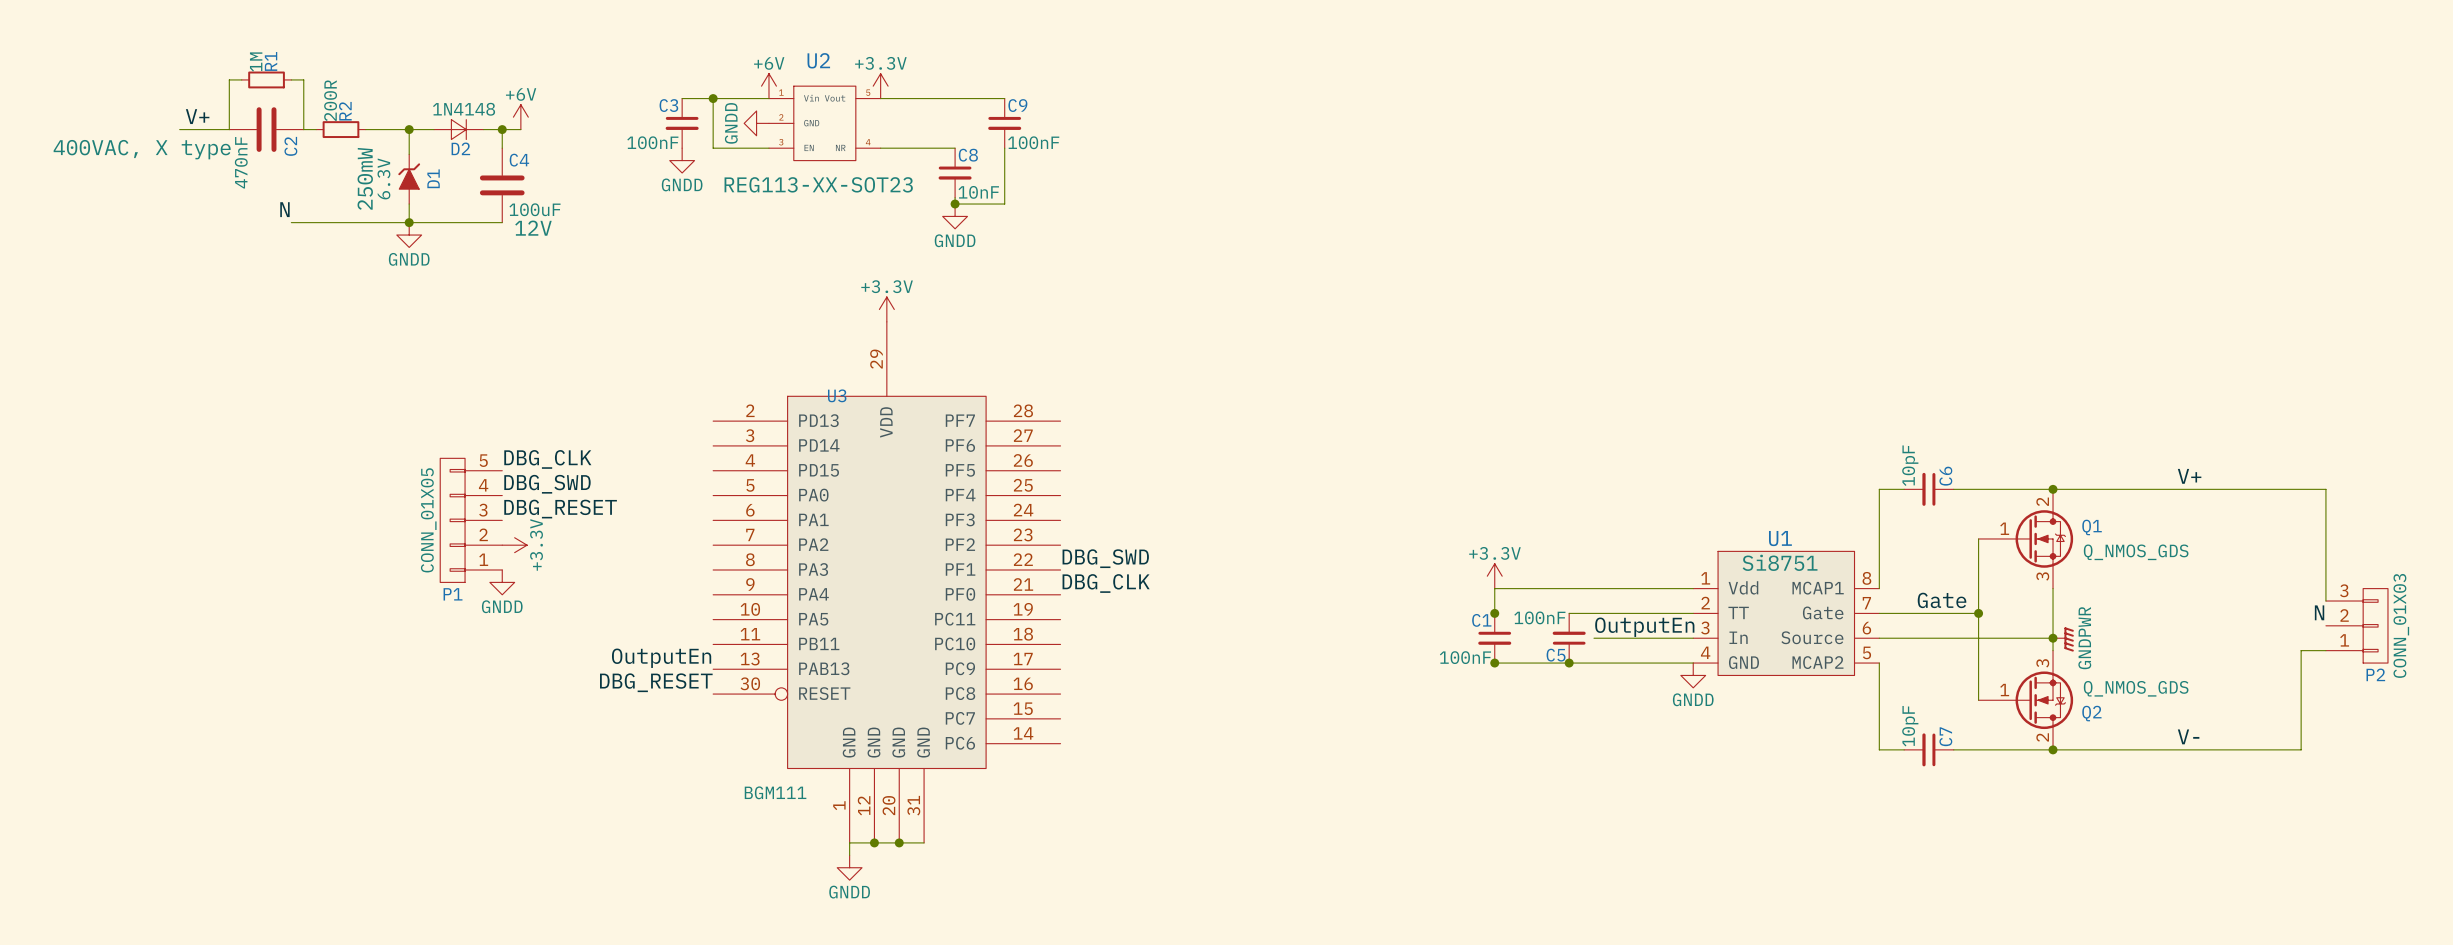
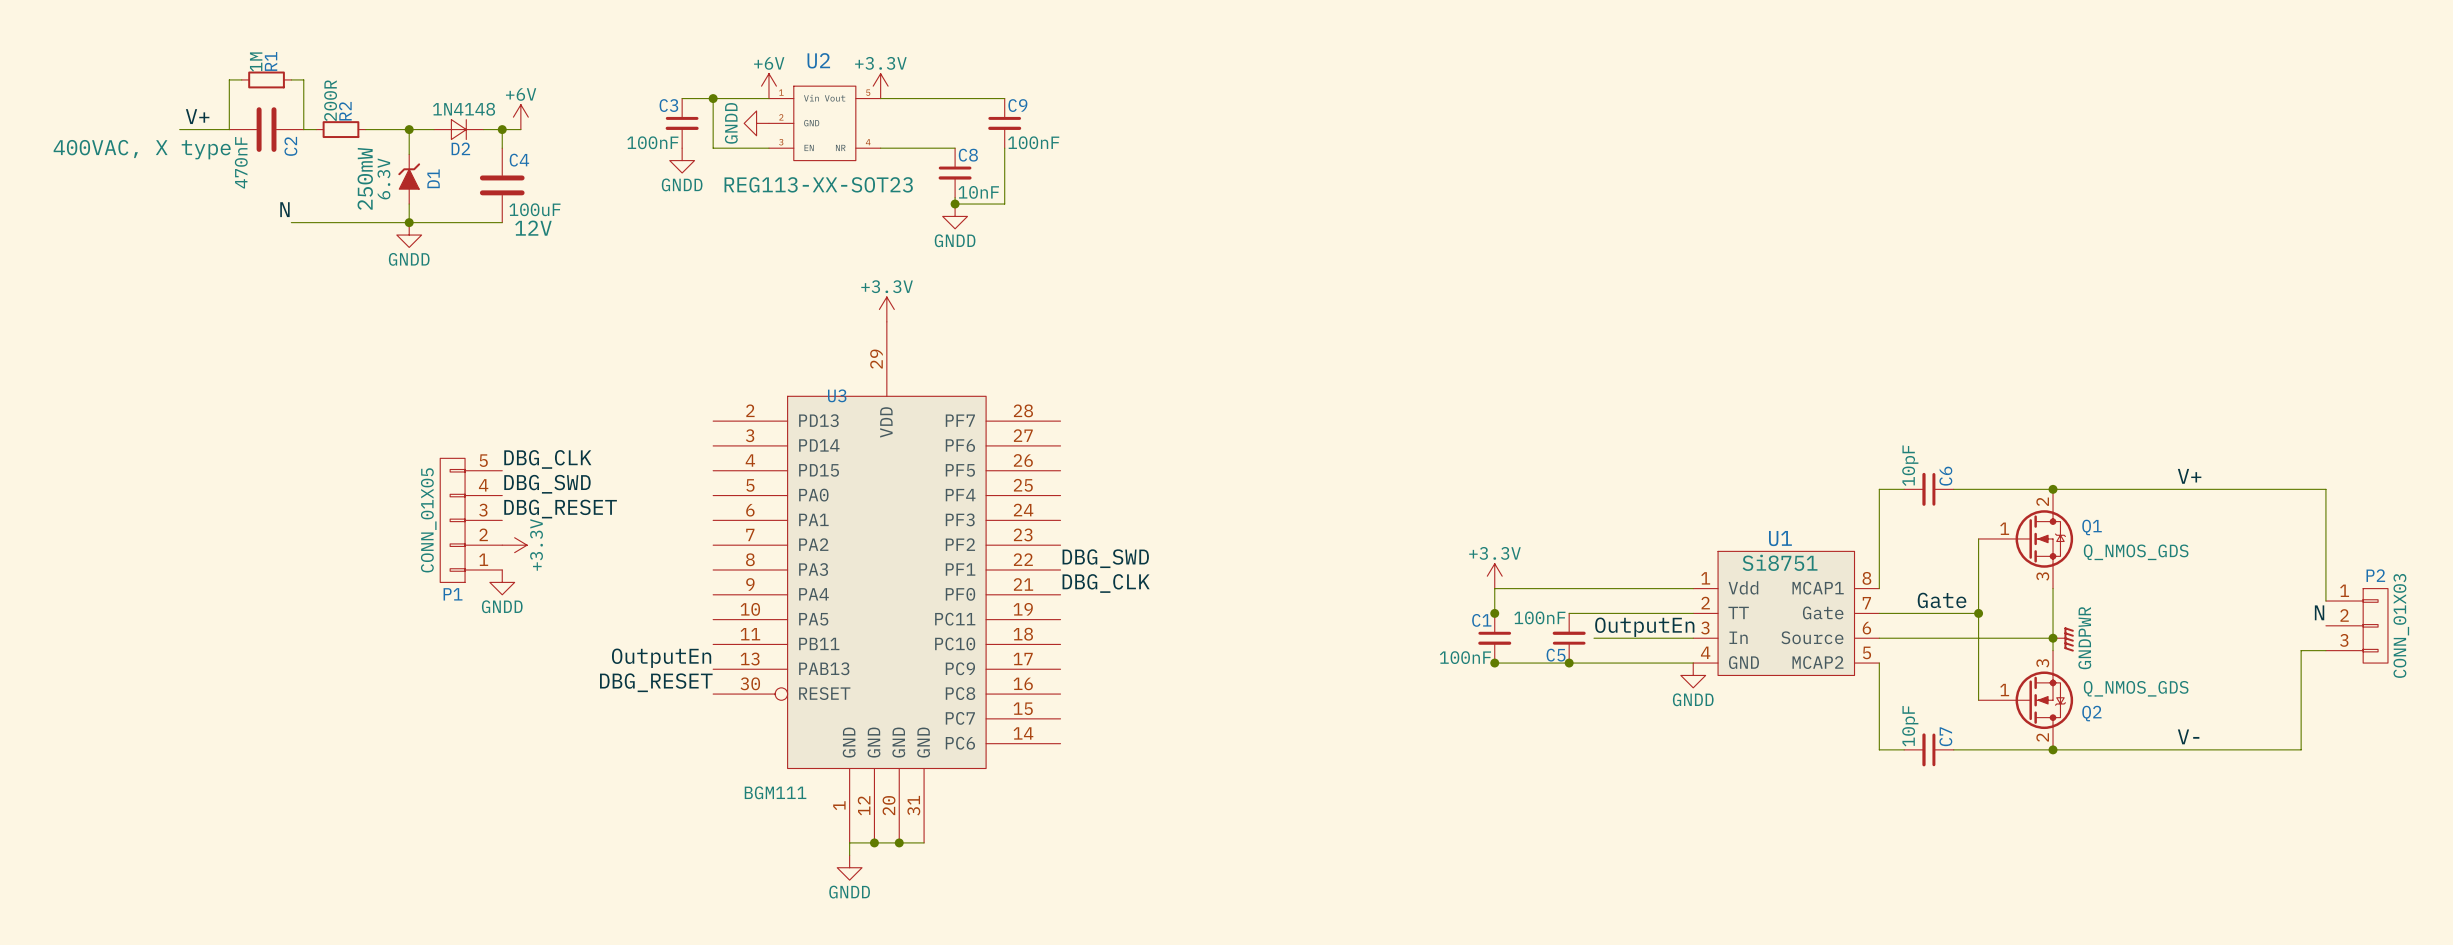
P2 flip: as is (2375, 625) -> up-down (2375, 625)

